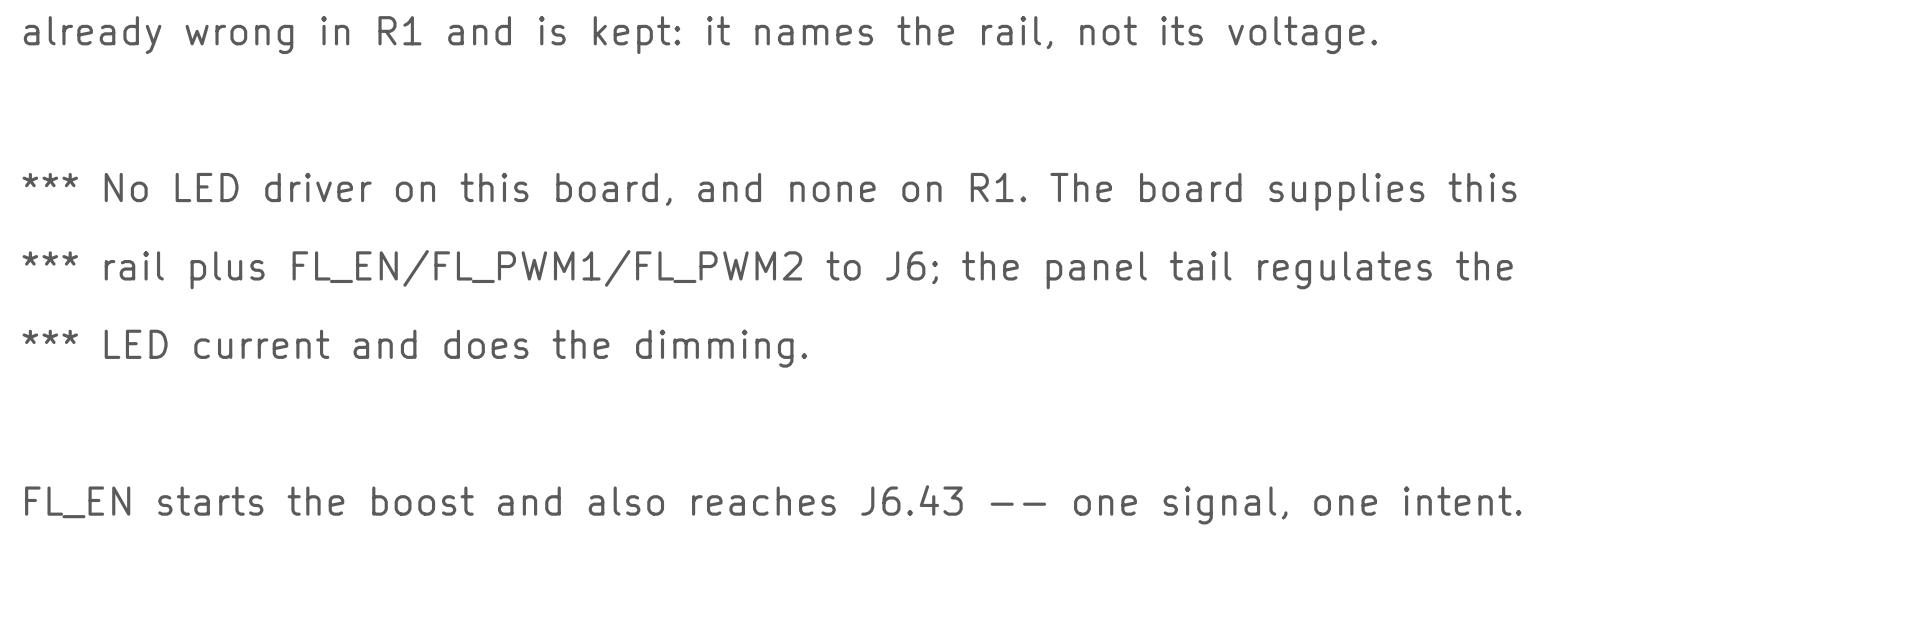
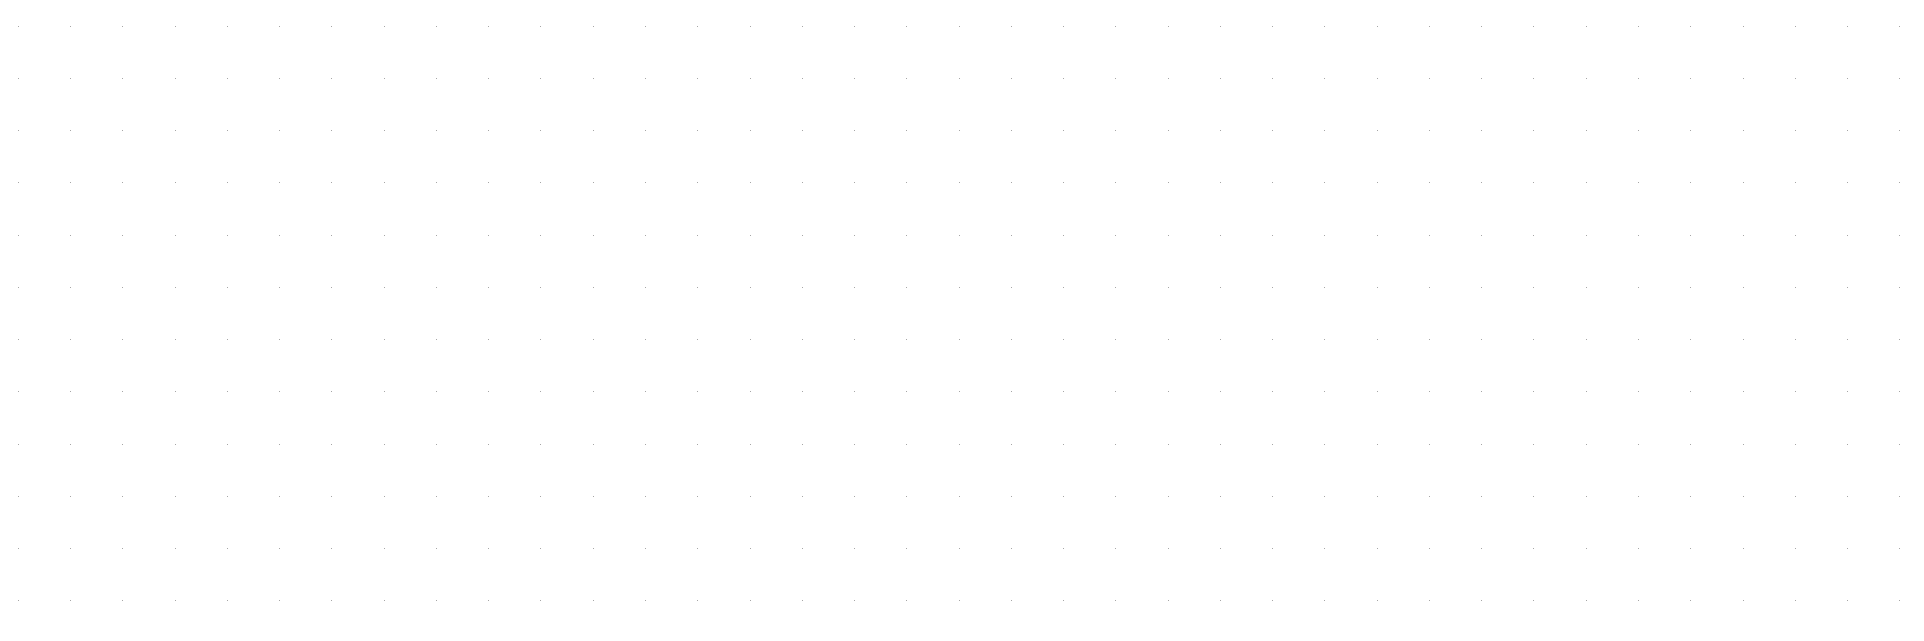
text: already wrong in R1 and is kept: it names the rail, not its voltage. (700, 35) -> none
text: *** No LED driver on this board, and none on R1. The board supplies this (769, 191) -> none
text: *** rail plus FL_EN/FL_PWM1/FL_PWM2 to J6; the panel tail regulates the (767, 269) -> none
text: *** LED current and does the dimming. (414, 348) -> none
text: FL_EN starts the boost and also reaches J6.43 -- one signal, one intent. (773, 504) -> none

